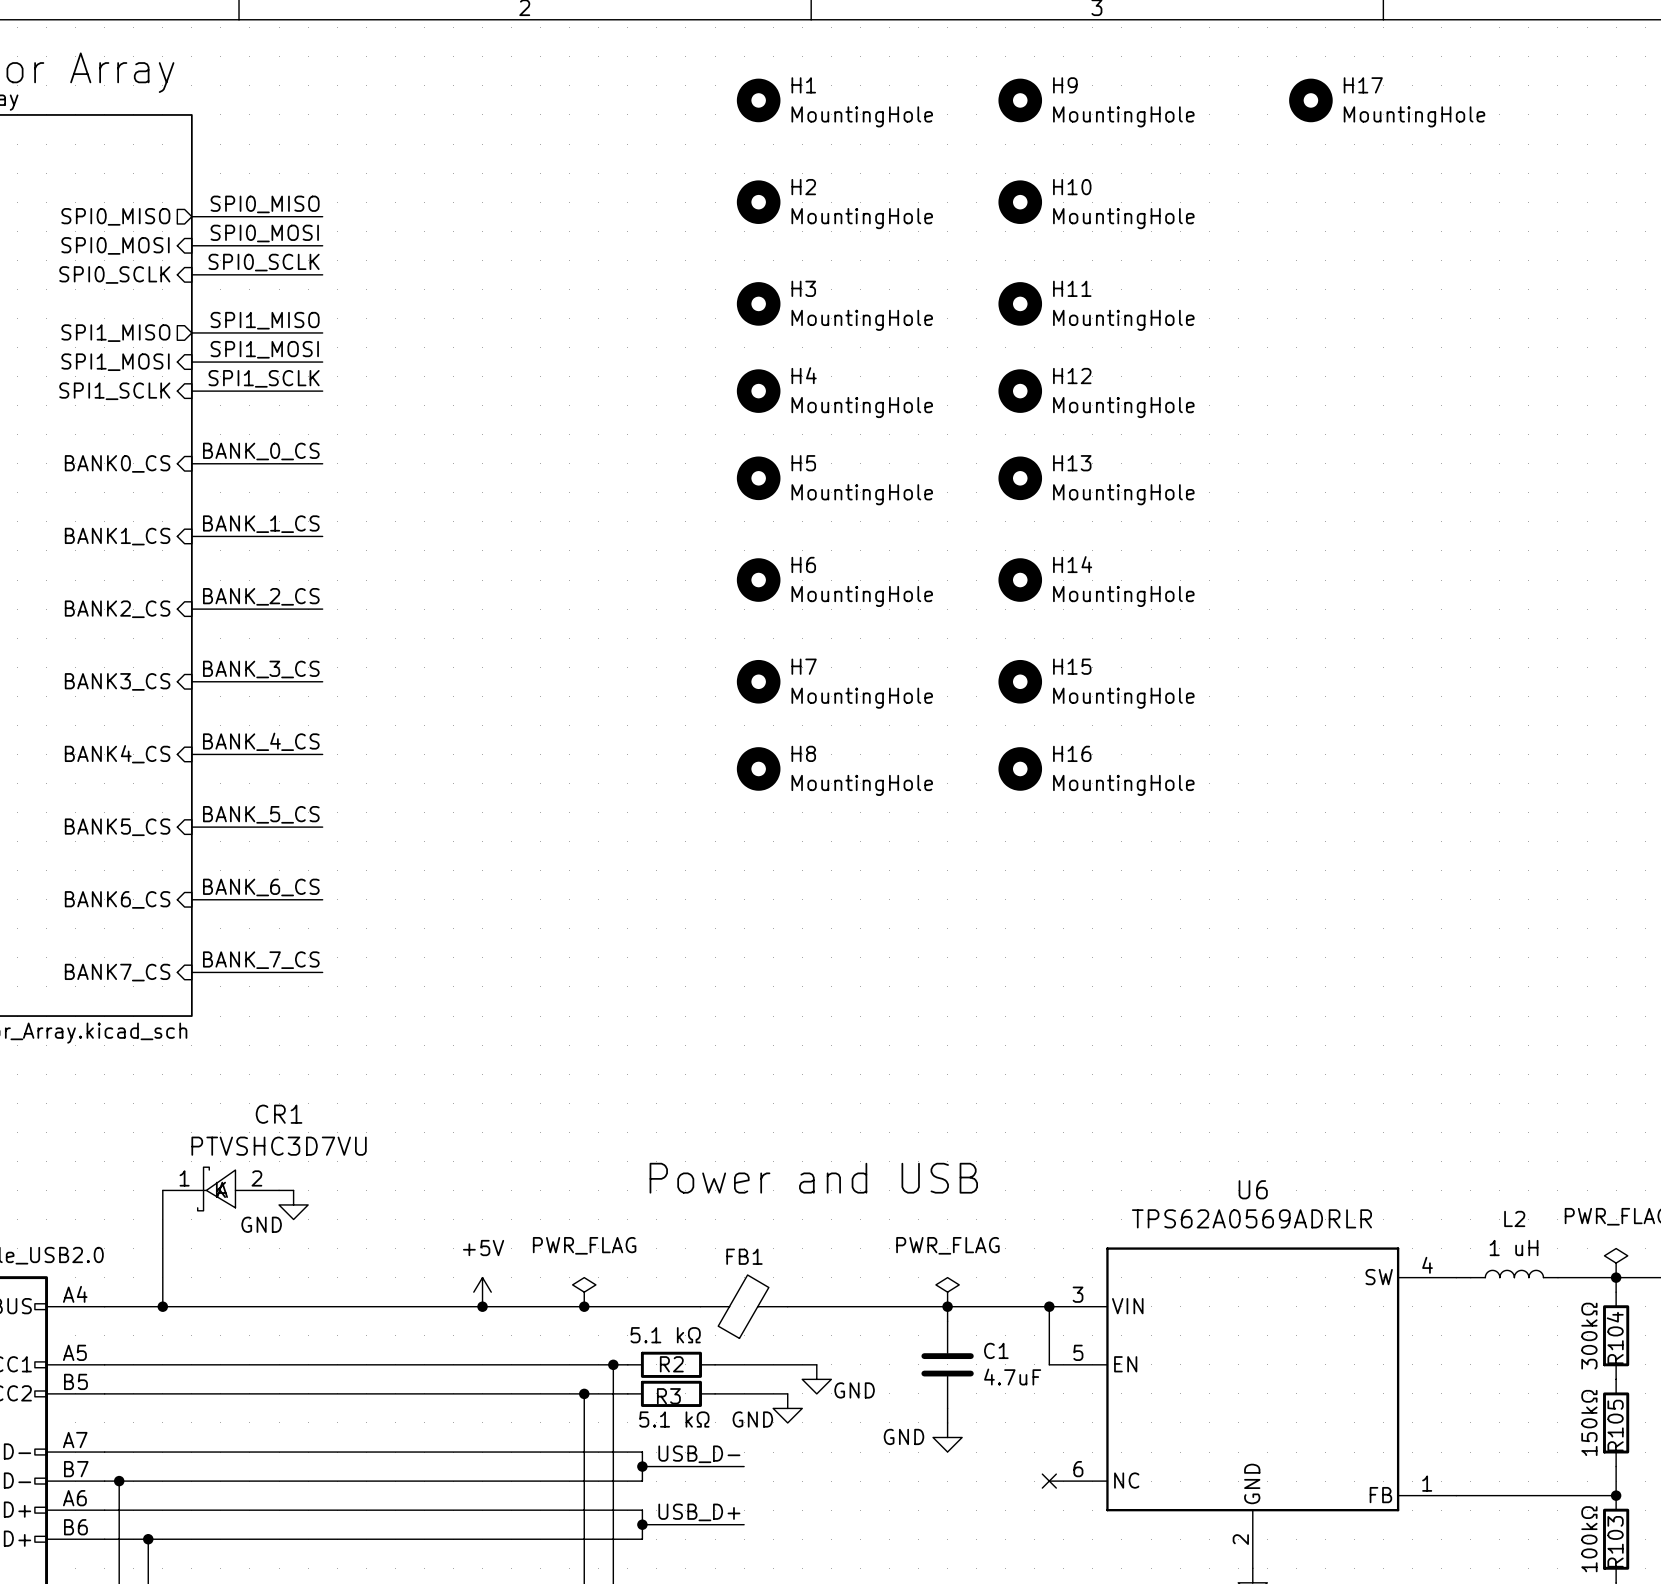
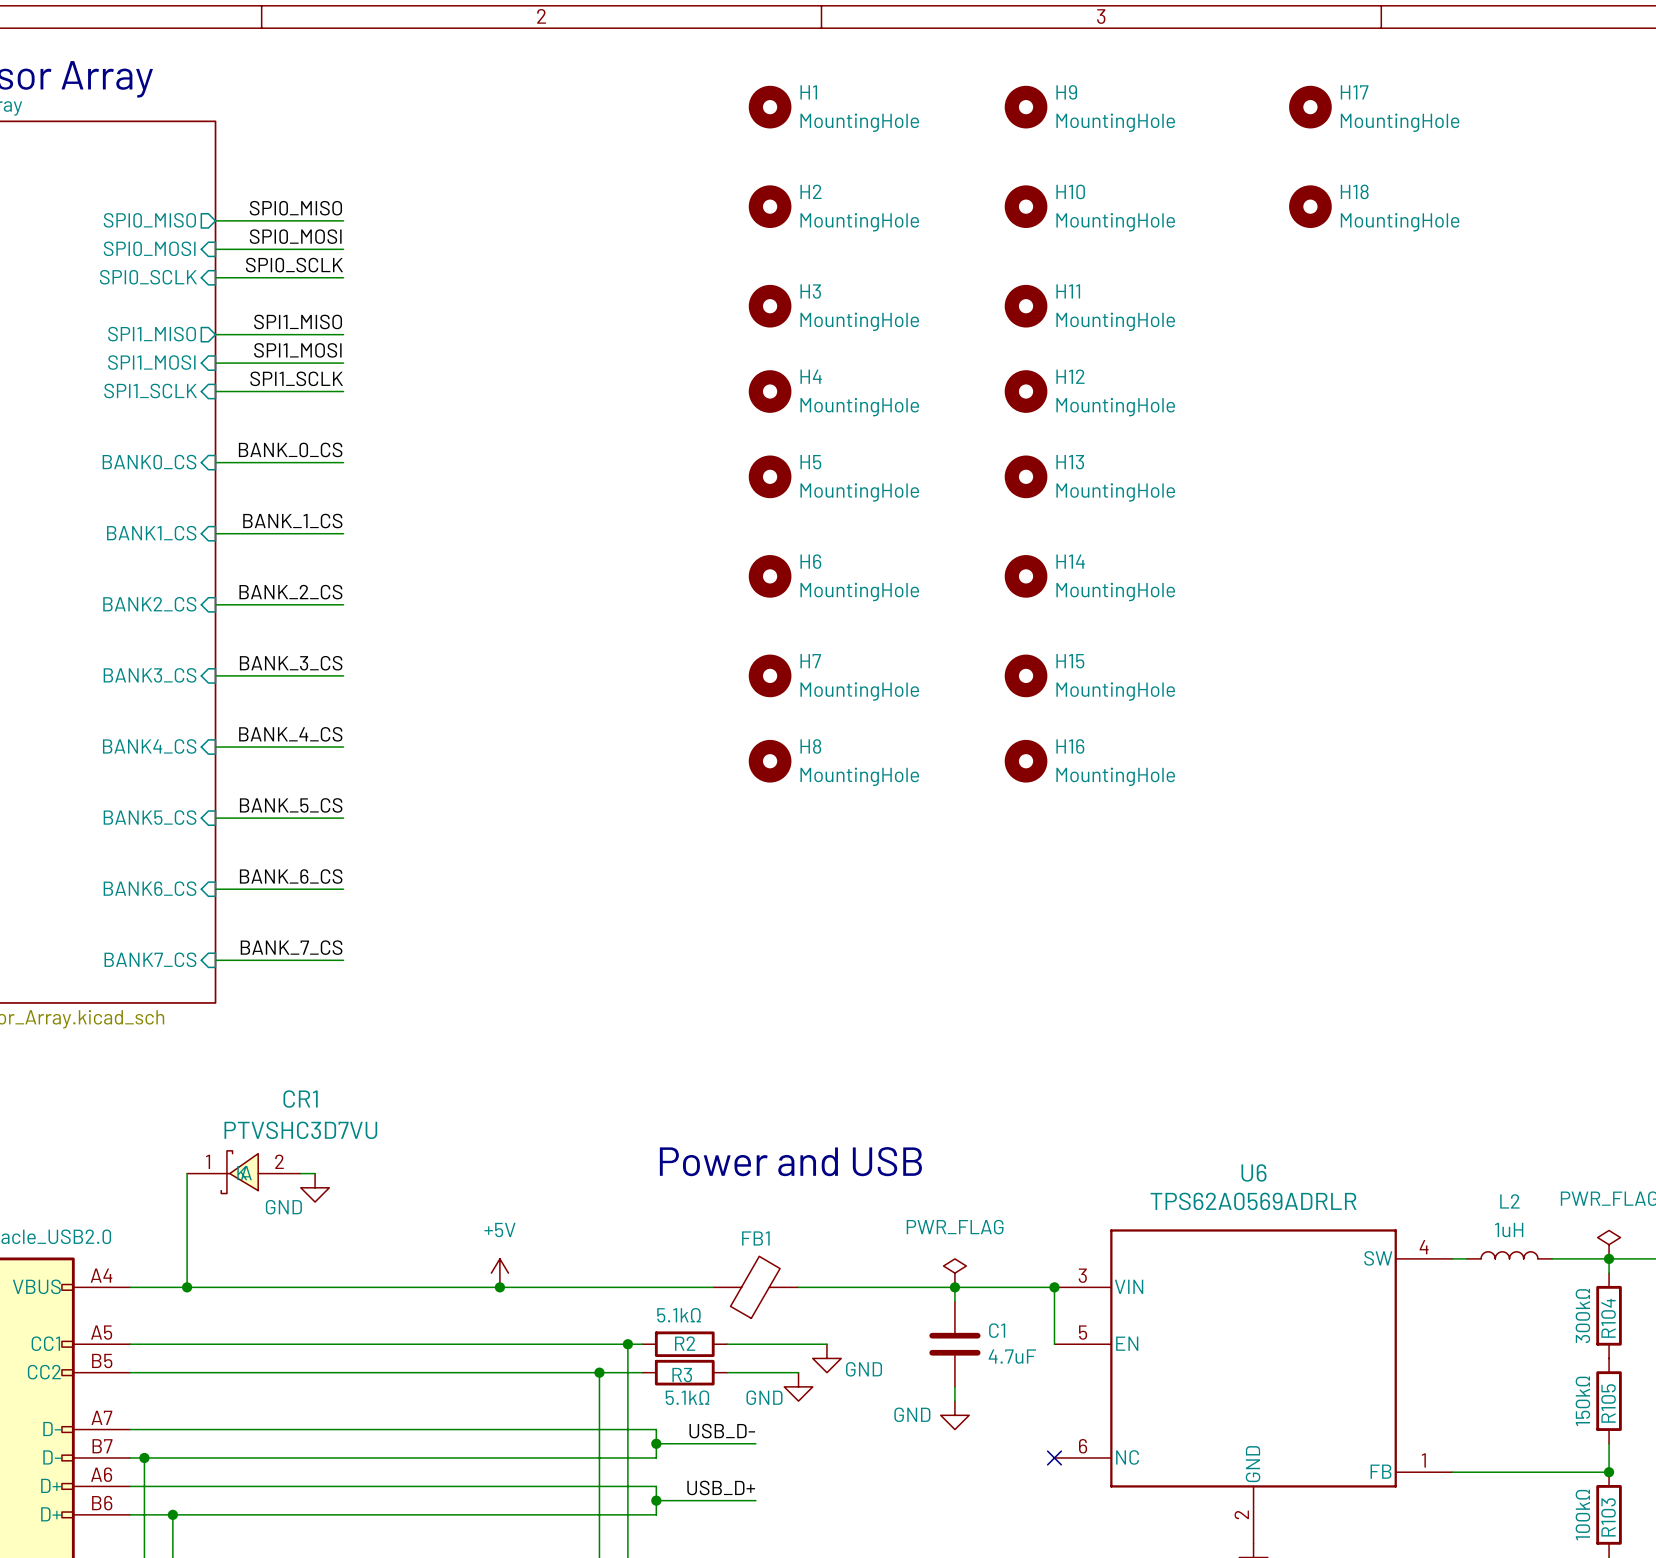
H18: none -> MountingHole (1310, 206)
L2 value: 1 uH (1514, 1248) -> 1uH (1509, 1230)
power symbol: PWR_FLAG (584, 1292) -> none
junction: (584, 1306) -> none
R2 value: 5.1 kΩ (665, 1335) -> 5.1kΩ (679, 1315)
R3 value: 5.1 kΩ (674, 1419) -> 5.1kΩ (687, 1397)

